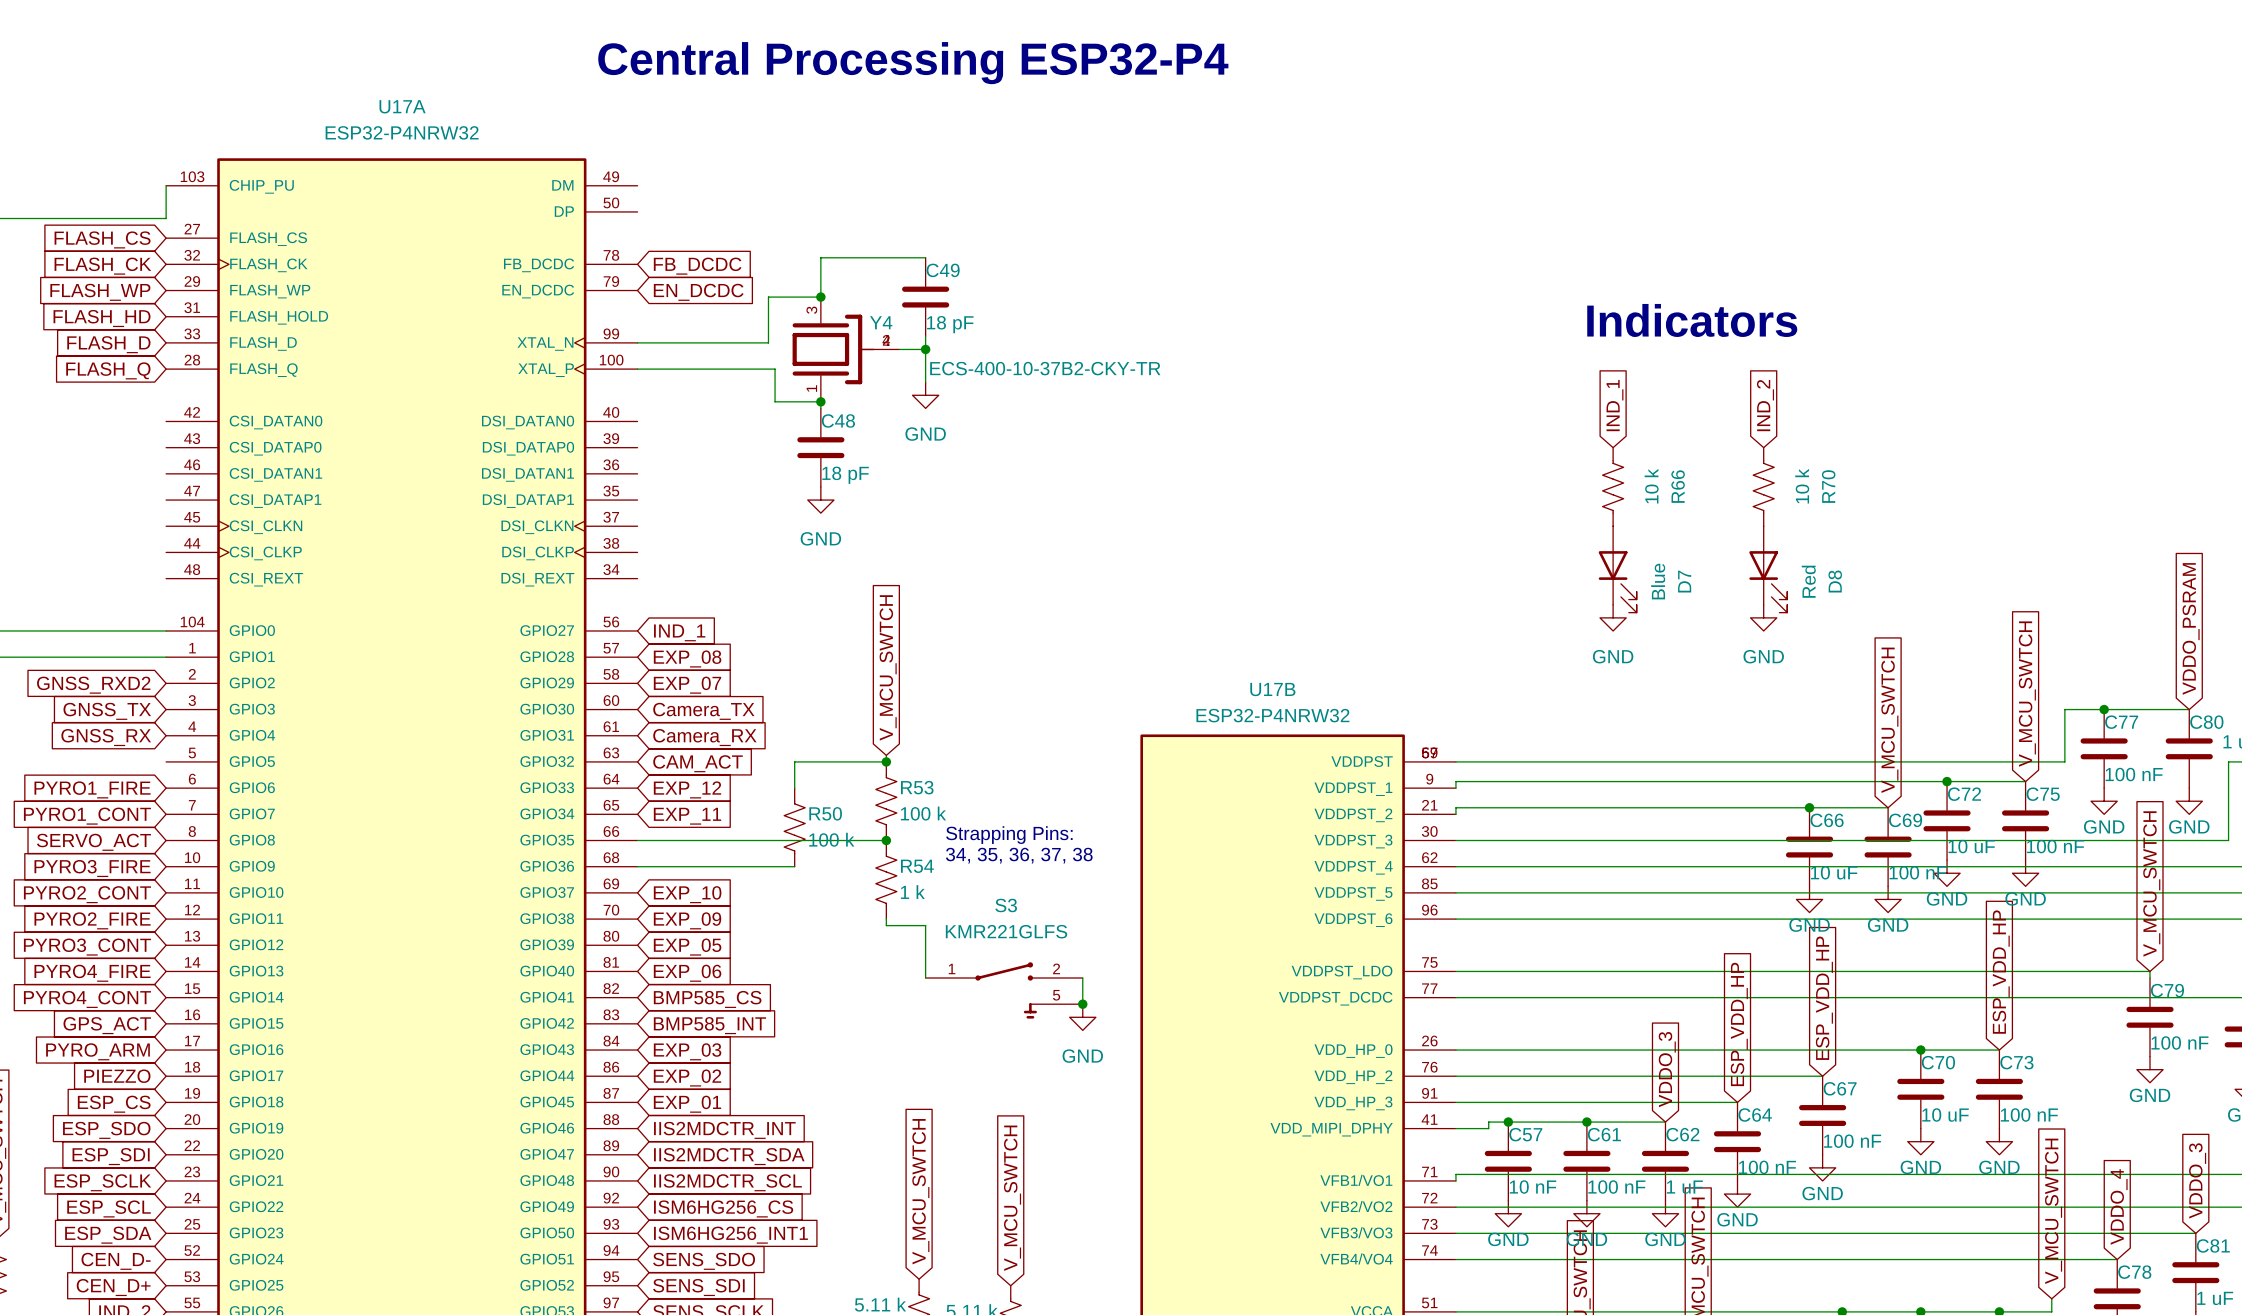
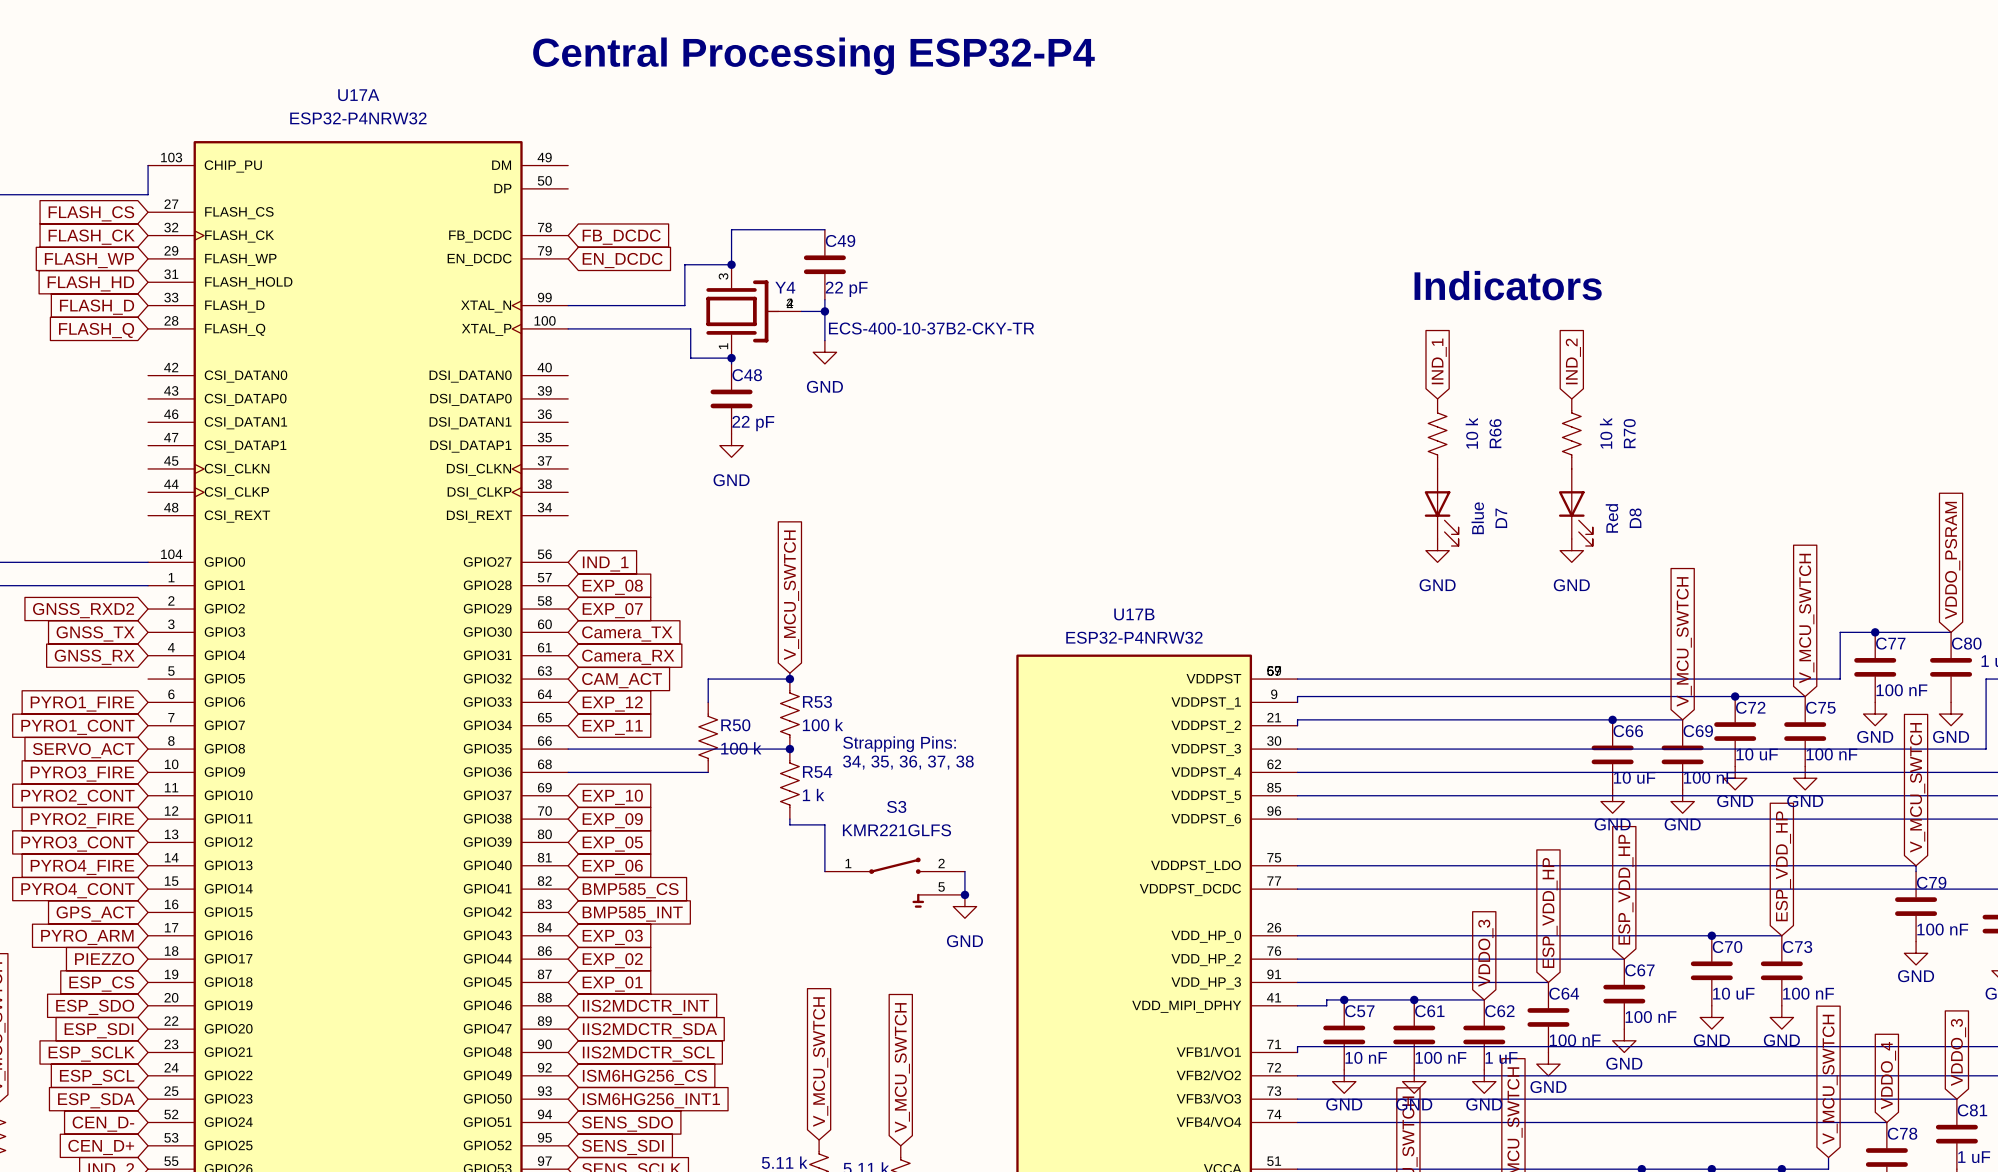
C49 value: 18 pF (950, 324) -> 22 pF (846, 289)
C48 value: 18 pF (845, 475) -> 22 pF (753, 423)

